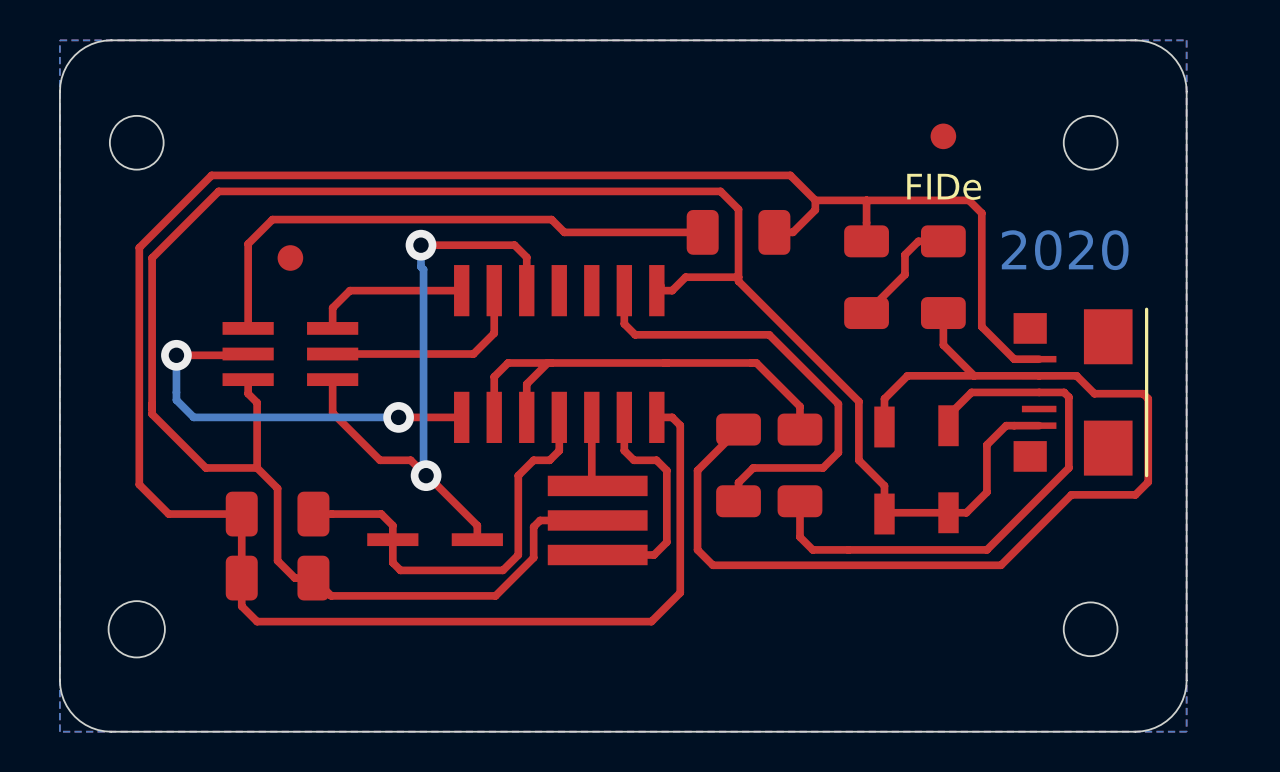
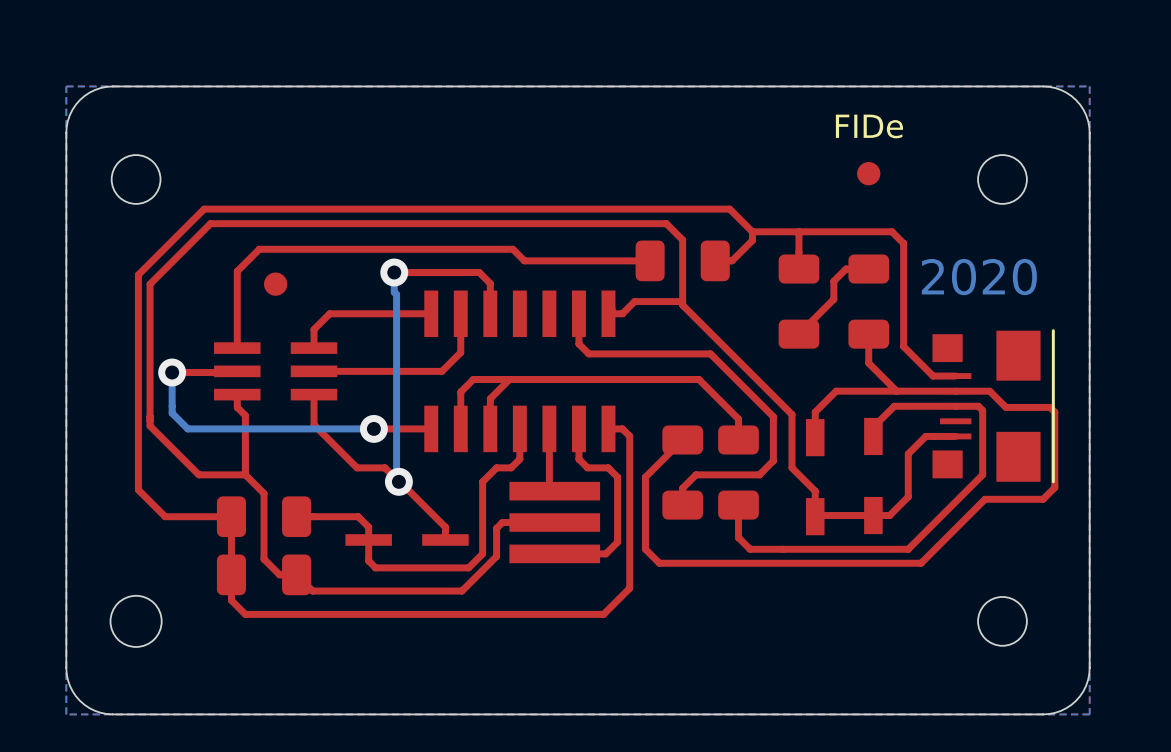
FIDe name position: FIDe (944, 186) -> FIDe (869, 126)

